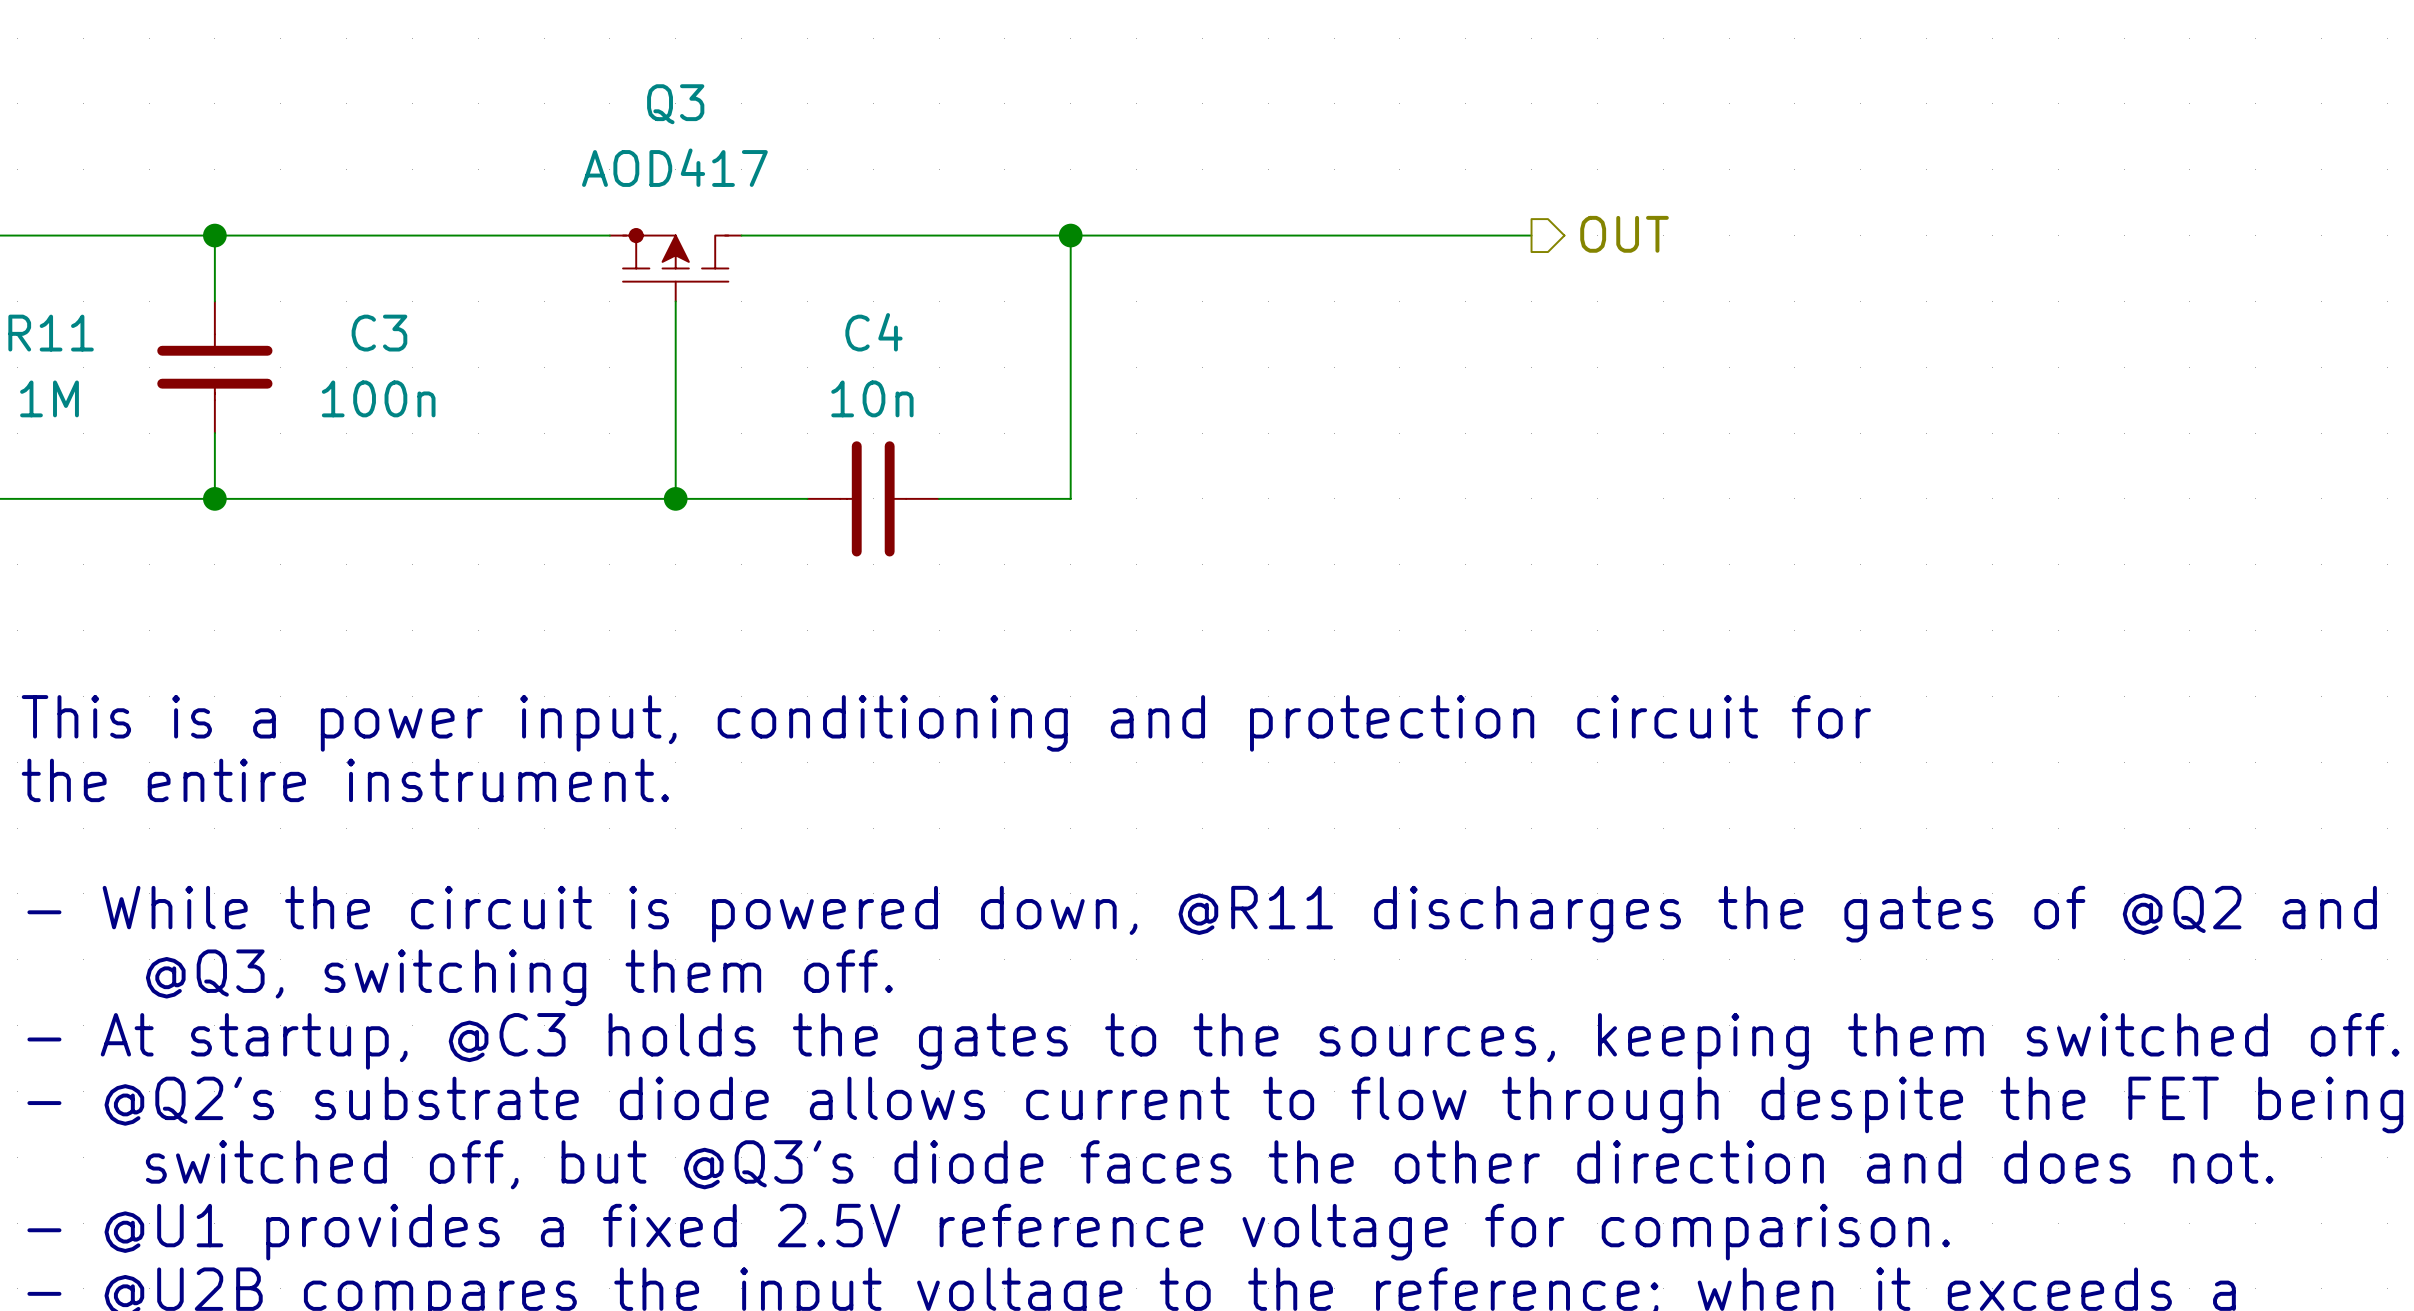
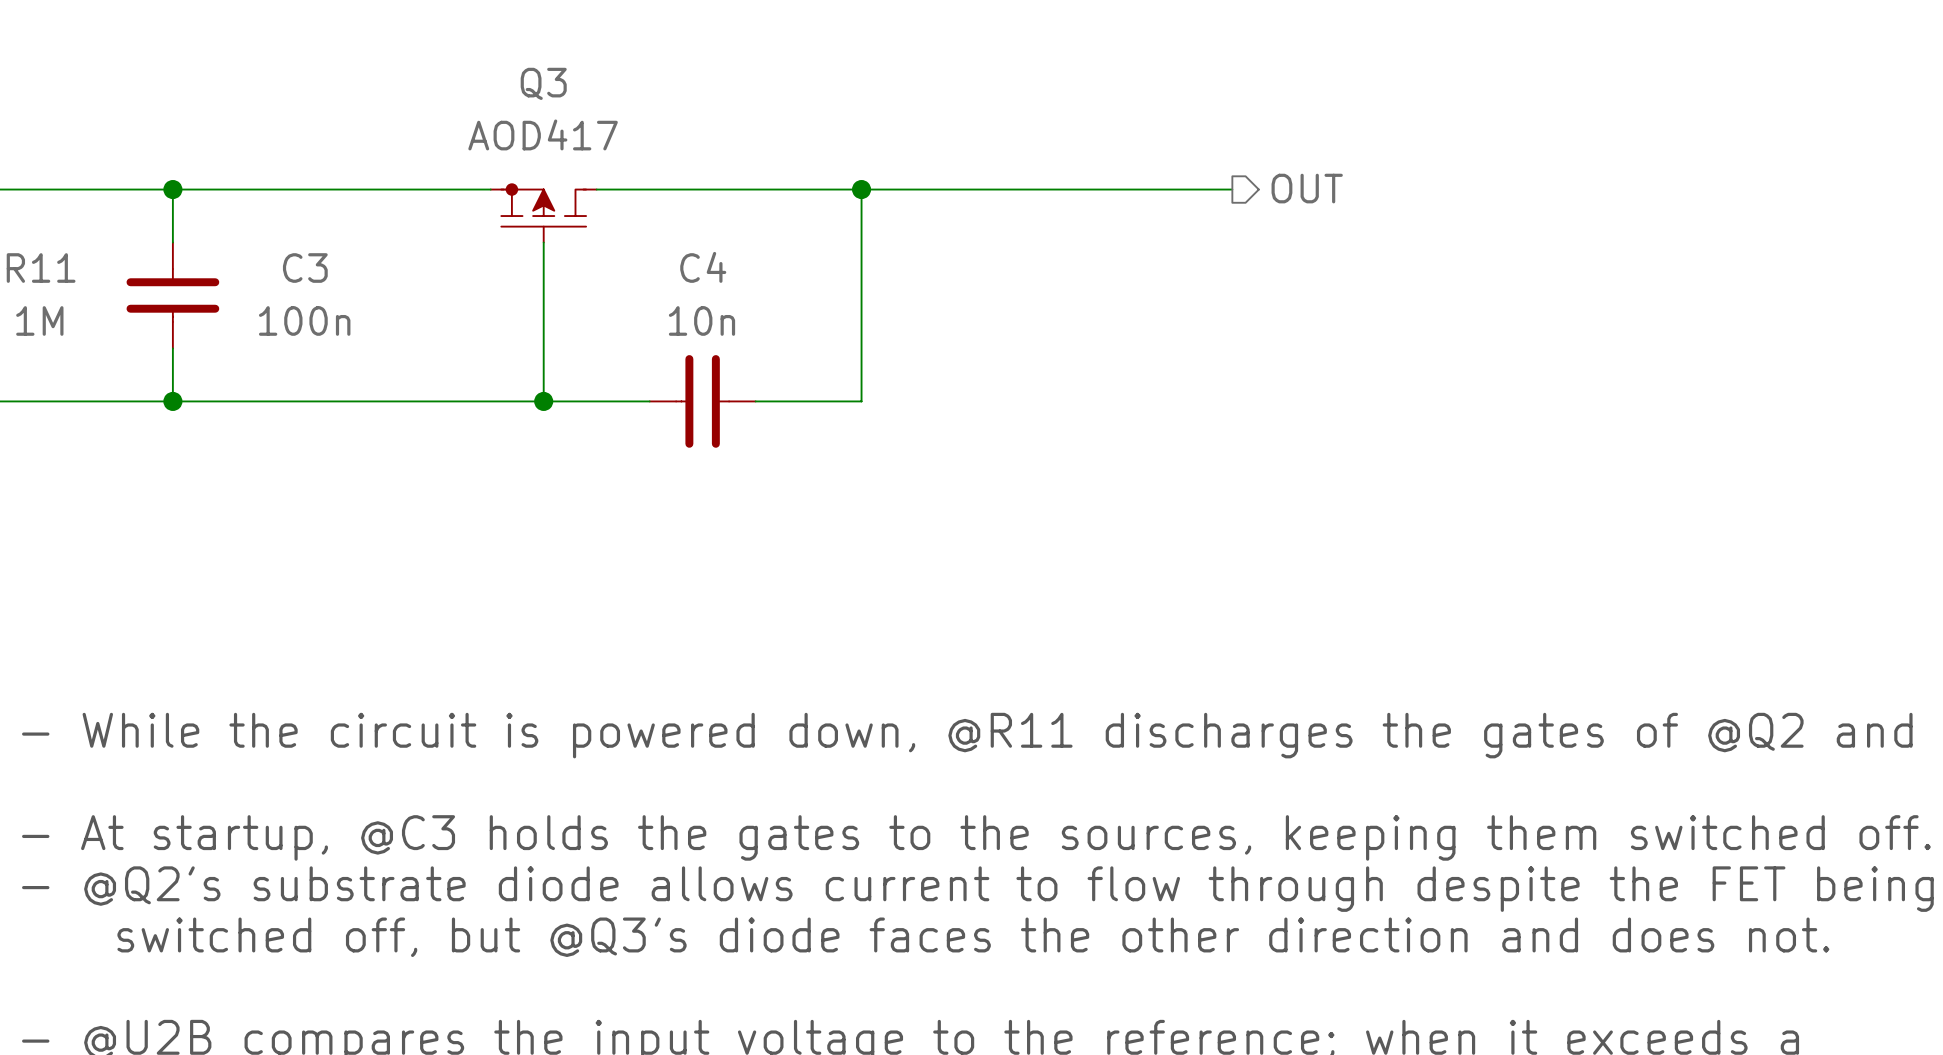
text: This is a power input, conditioning and protection circuit for (946, 723) -> none
text: the entire instrument. (345, 780) -> none
text: @Q3, switching them off. (519, 977) -> none
text: - @U1 provides a fixed 2.5V reference voltage for comparison. (988, 1232) -> none

